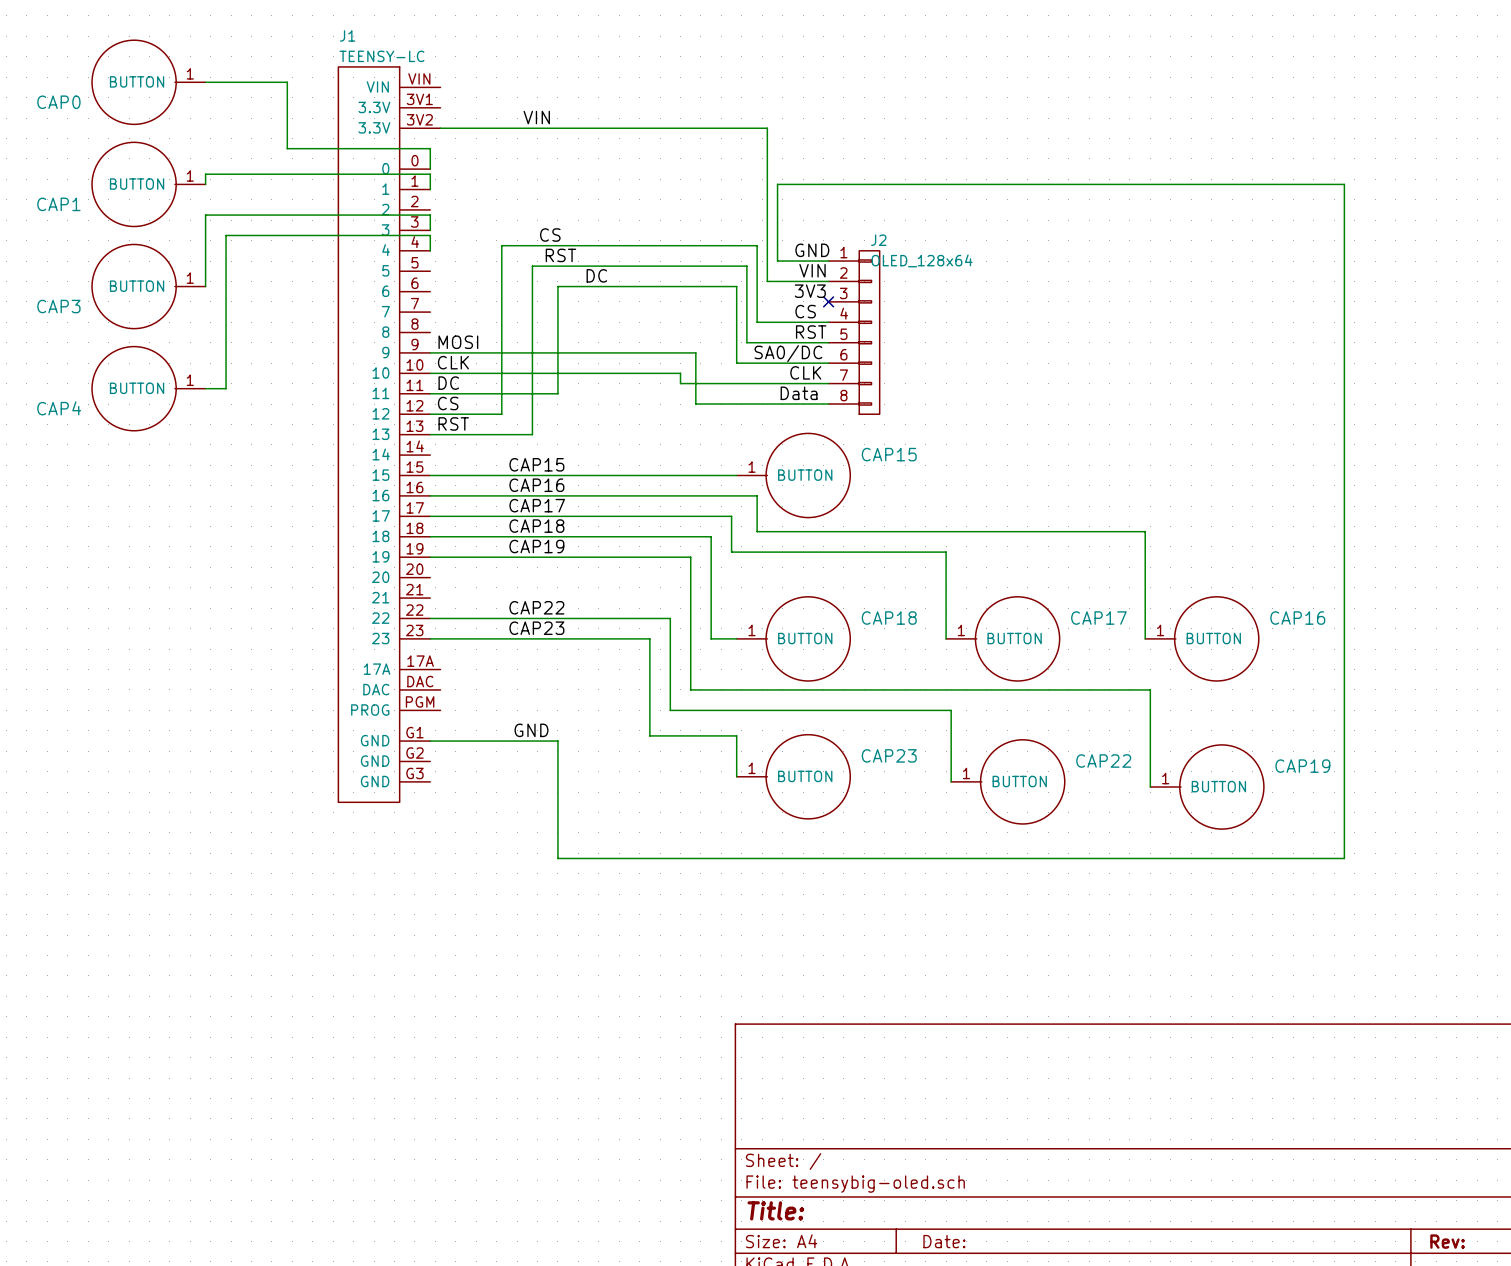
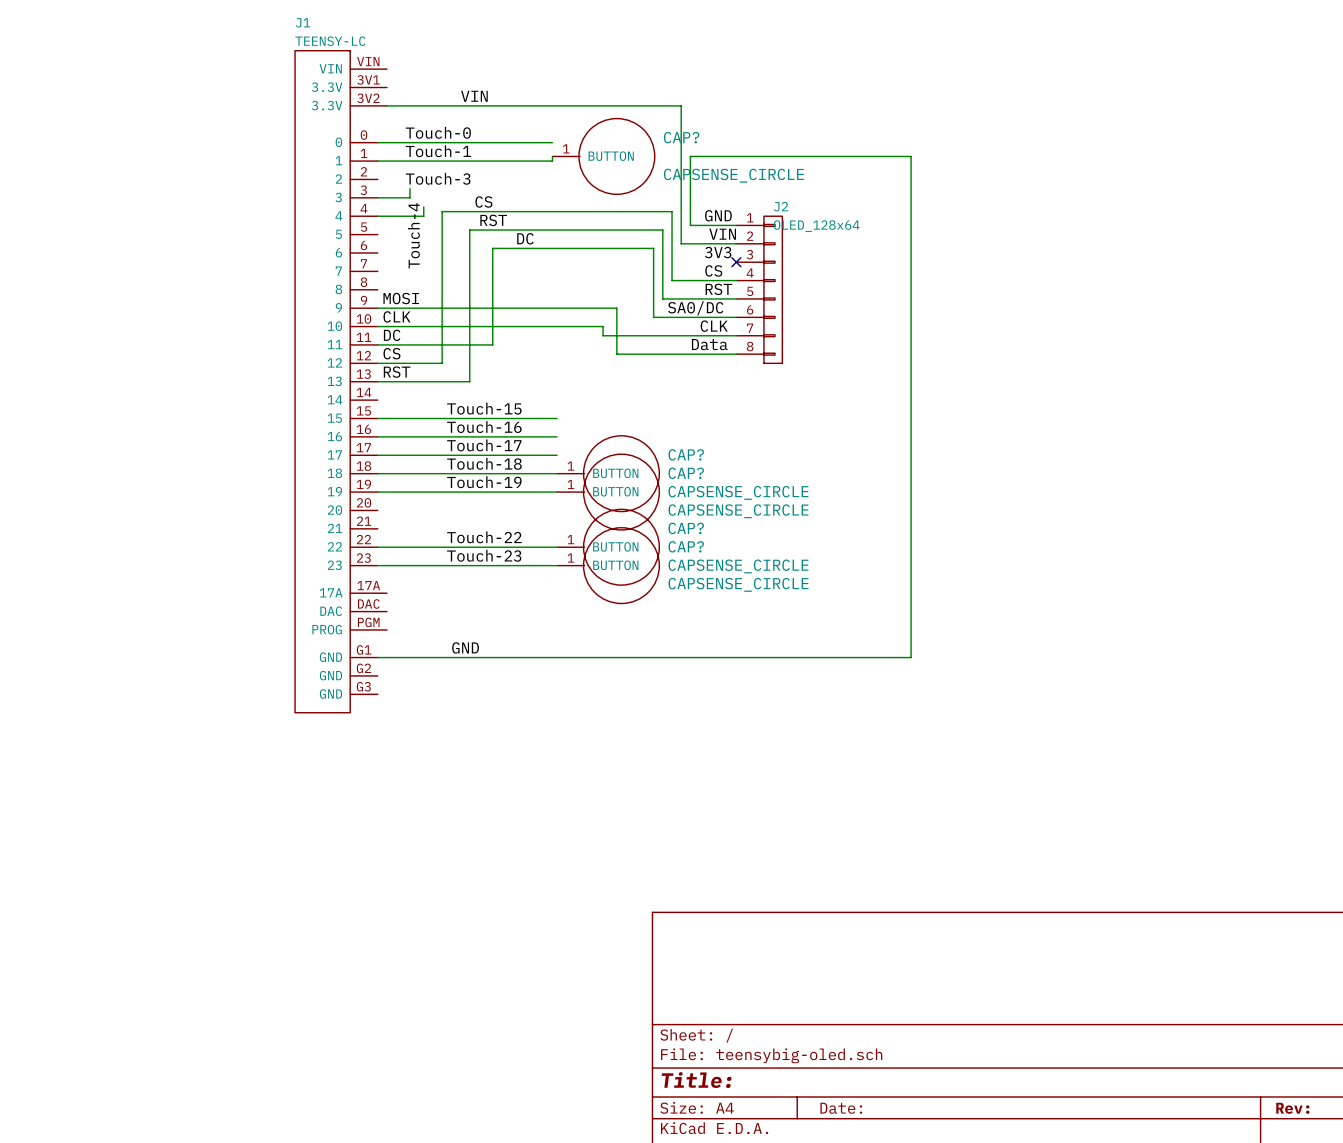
CAP0: (148, 82) -> none
wire: (205, 82) (287, 82) (287, 148) (430, 148) (430, 169) -> (552, 142) (377, 142)
label: none -> Touch-0 (438, 132)
label: none -> Touch-1 (438, 151)
CAP1: (148, 184) -> none
wire: (205, 184) (205, 174) (430, 174) (430, 189) -> (552, 156) (552, 161) (377, 161)
CAP?: none -> CAPSENSE_CIRCLE (603, 156)
wire: (1022, 184) (1344, 184) (1344, 858) (557, 858) (557, 741) -> (911, 156) (911, 657) (492, 657)
label: none -> Touch-3 (438, 178)
wire: (430, 230) (430, 215) (205, 215) (205, 286) -> (377, 197) (409, 197) (409, 188)
wire: (430, 250) (430, 235) (226, 235) (226, 388) (205, 388) -> (377, 216) (423, 216) (423, 207)
label: none -> Touch-4 (413, 235)
CAP3: (148, 286) -> none
CAP4: (148, 388) -> none
label: CAP15 (536, 464) -> Touch-15 (484, 408)
wire: (629, 475) (736, 475) -> none
CAP15: (793, 475) -> none
label: CAP16 (536, 485) -> Touch-16 (484, 427)
wire: (629, 495) (757, 495) (757, 531) (1145, 531) (1145, 638) -> none
label: CAP17 (537, 505) -> Touch-17 (484, 445)
wire: (629, 516) (731, 516) (731, 552) (946, 552) (946, 638) -> none
label: CAP18 (536, 526) -> Touch-18 (484, 463)
wire: (629, 536) (711, 536) (711, 638) (736, 638) -> none
CAP?: none -> CAPSENSE_CIRCLE (608, 473)
label: CAP19 (536, 546) -> Touch-19 (484, 482)
wire: (629, 557) (690, 557) (690, 689) (1150, 689) (1150, 787) -> none
CAP?: none -> CAPSENSE_CIRCLE (608, 492)
label: CAP22 (536, 607) -> Touch-22 (484, 537)
wire: (629, 618) (670, 618) (670, 710) (951, 710) (951, 781) -> none
CAP?: none -> CAPSENSE_CIRCLE (608, 547)
label: CAP23 (536, 628) -> Touch-23 (484, 555)
wire: (629, 638) (649, 638) (649, 735) (736, 735) (736, 776) -> none
CAP?: none -> CAPSENSE_CIRCLE (608, 565)
CAP18: (793, 638) -> none
CAP17: (1002, 638) -> none
CAP16: (1202, 638) -> none
CAP23: (793, 776) -> none
CAP22: (1007, 781) -> none
CAP19: (1207, 787) -> none

